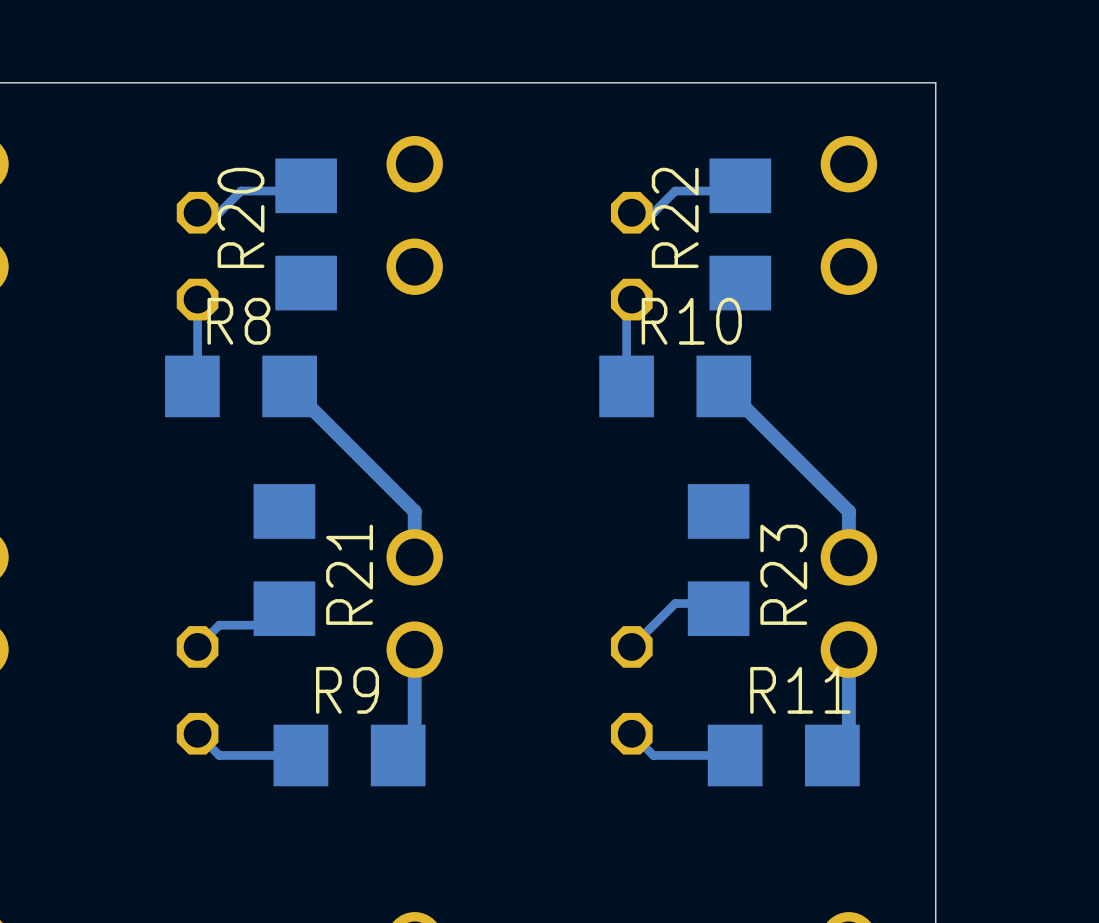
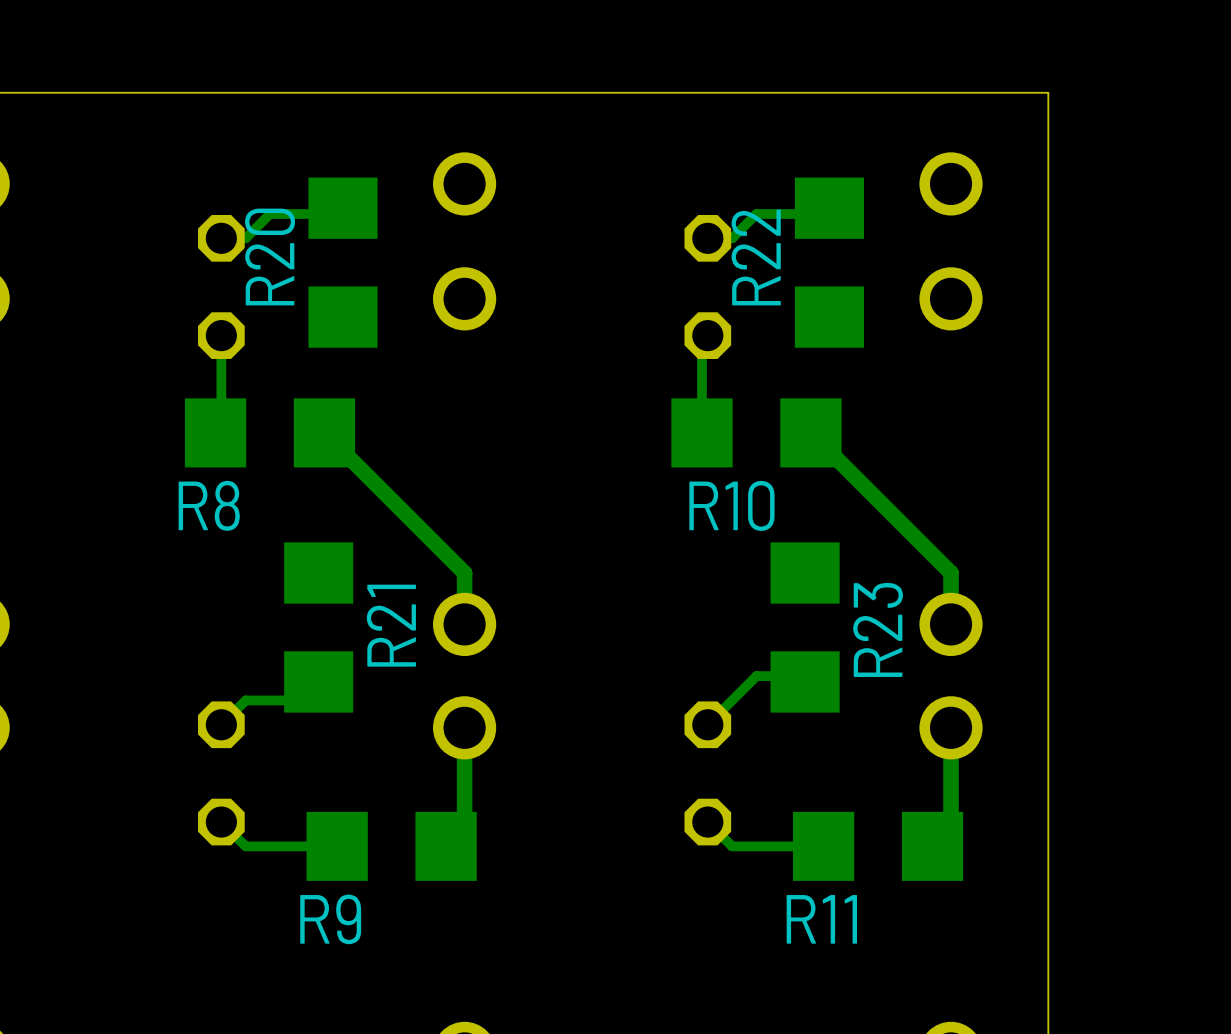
R8 name position: R8 (238, 321) -> R8 (209, 505)
R10 name position: R10 (691, 321) -> R10 (731, 505)
R9 name position: R9 (347, 690) -> R9 (330, 919)
R11 name position: R11 (800, 690) -> R11 (821, 919)

